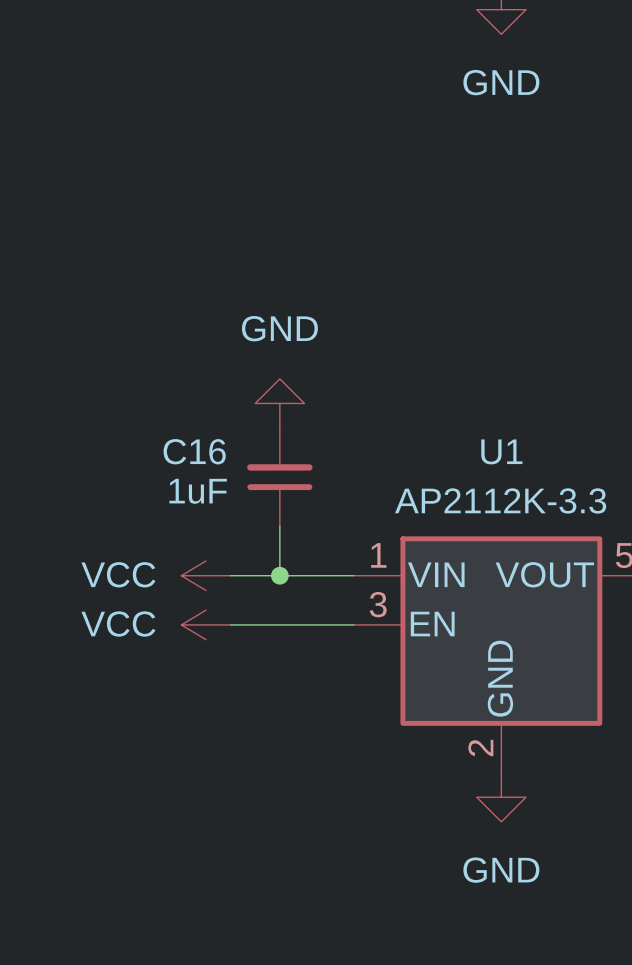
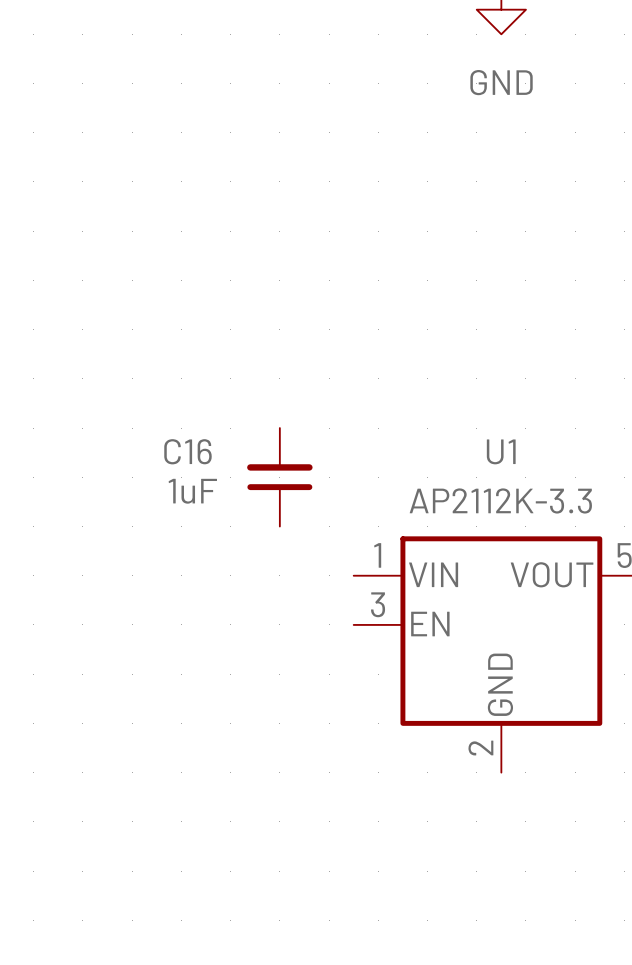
power symbol: GND (279, 403) -> none
wire: (279, 526) (279, 575) -> none
power symbol: VCC (206, 575) -> none
wire: (230, 575) (353, 575) -> none
junction: (279, 575) -> none
power symbol: VCC (206, 624) -> none
wire: (230, 624) (353, 624) -> none
power symbol: GND (501, 797) -> none

